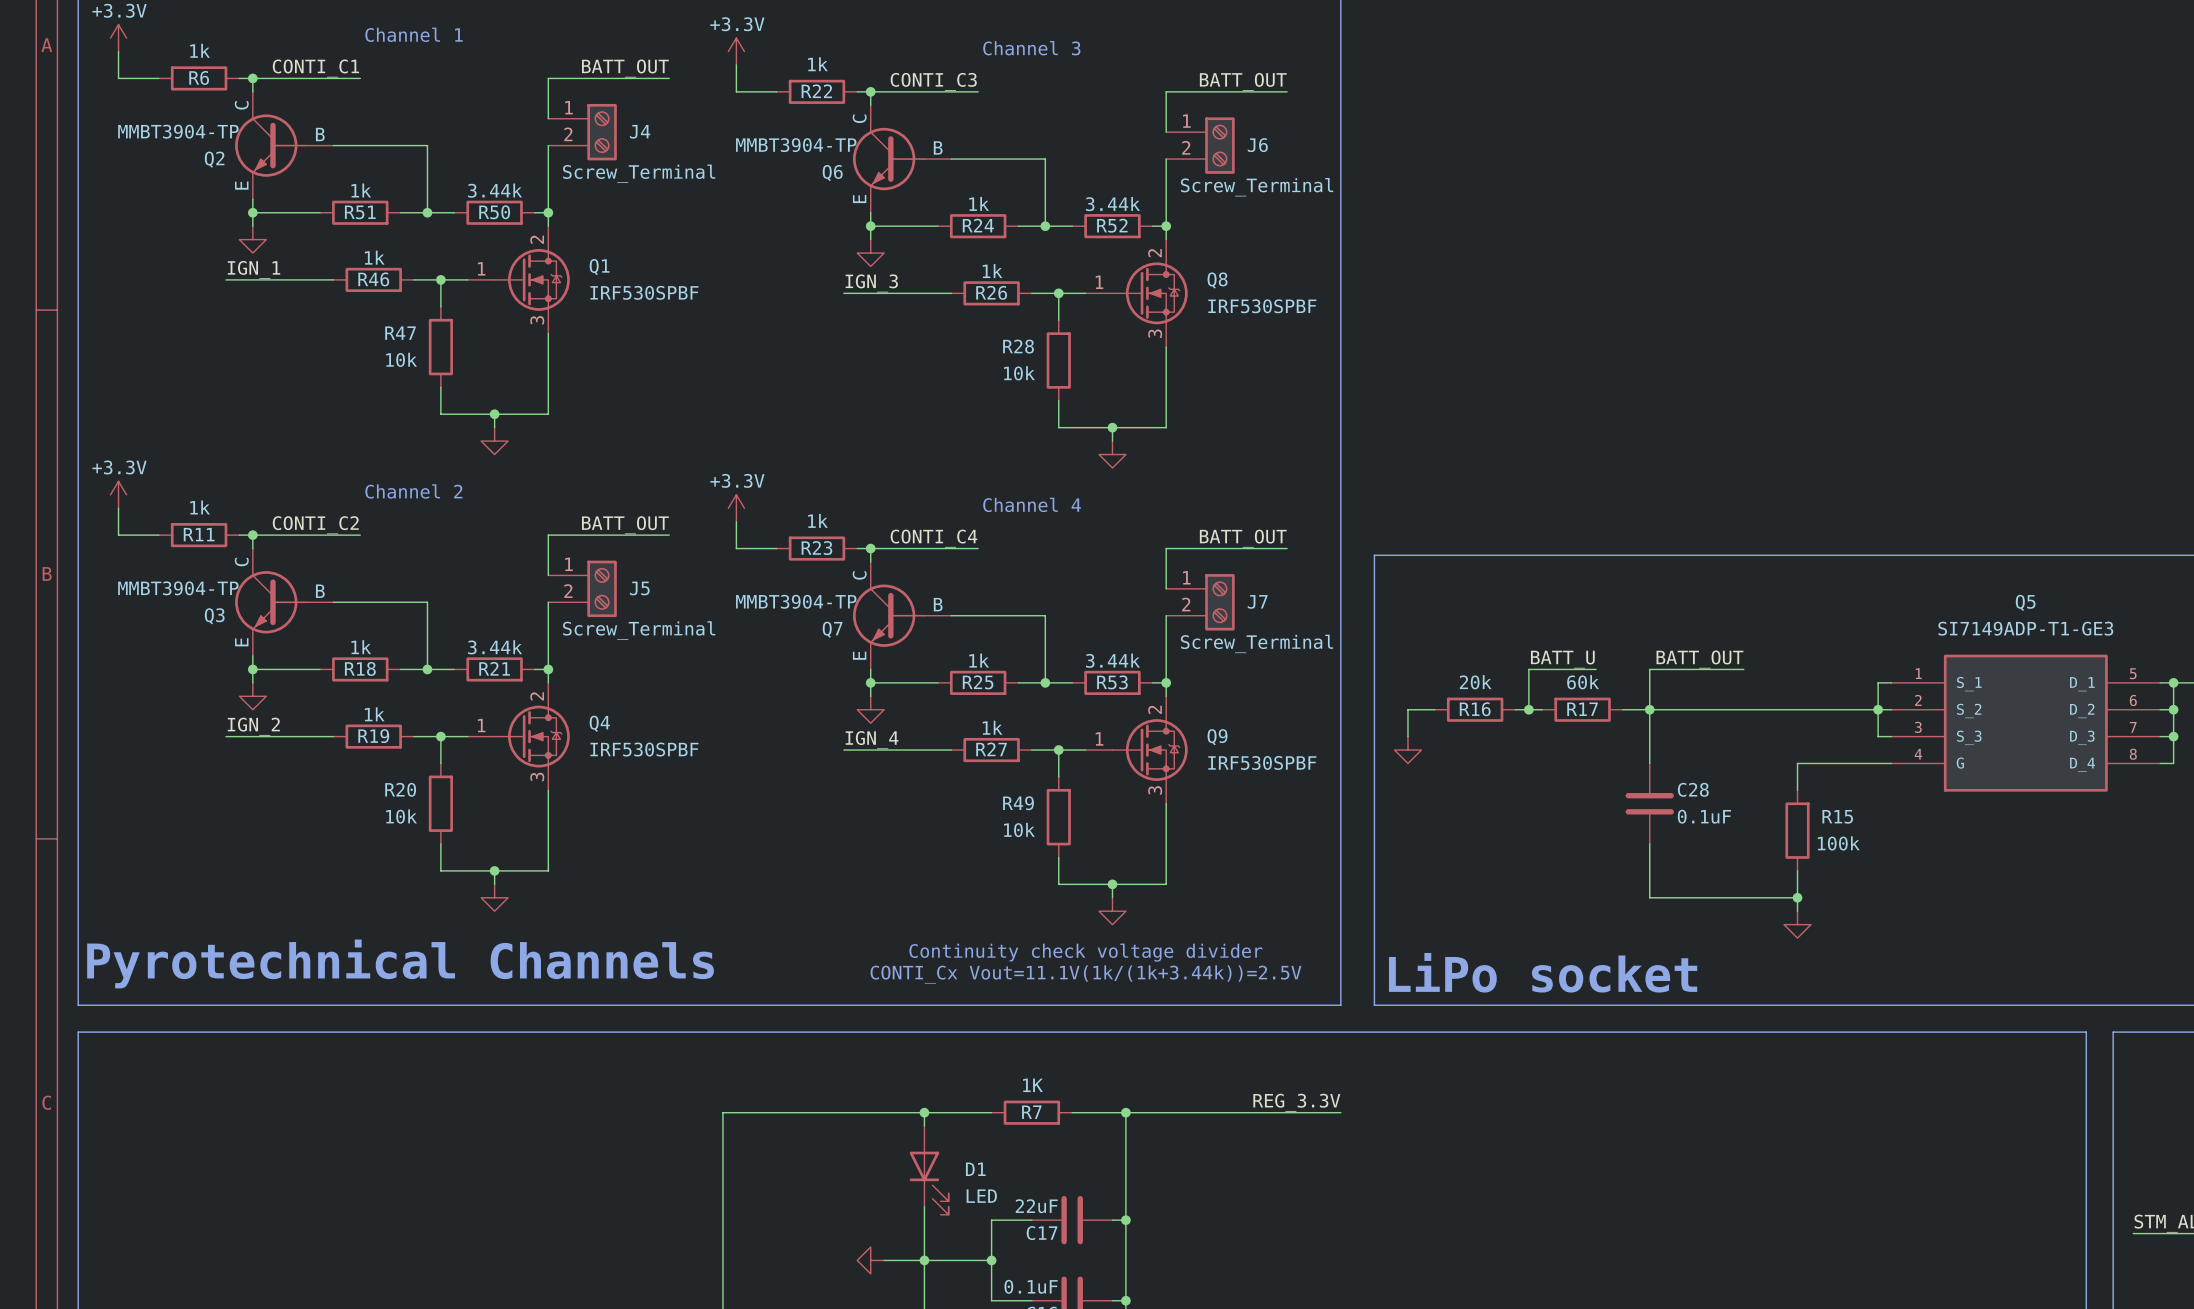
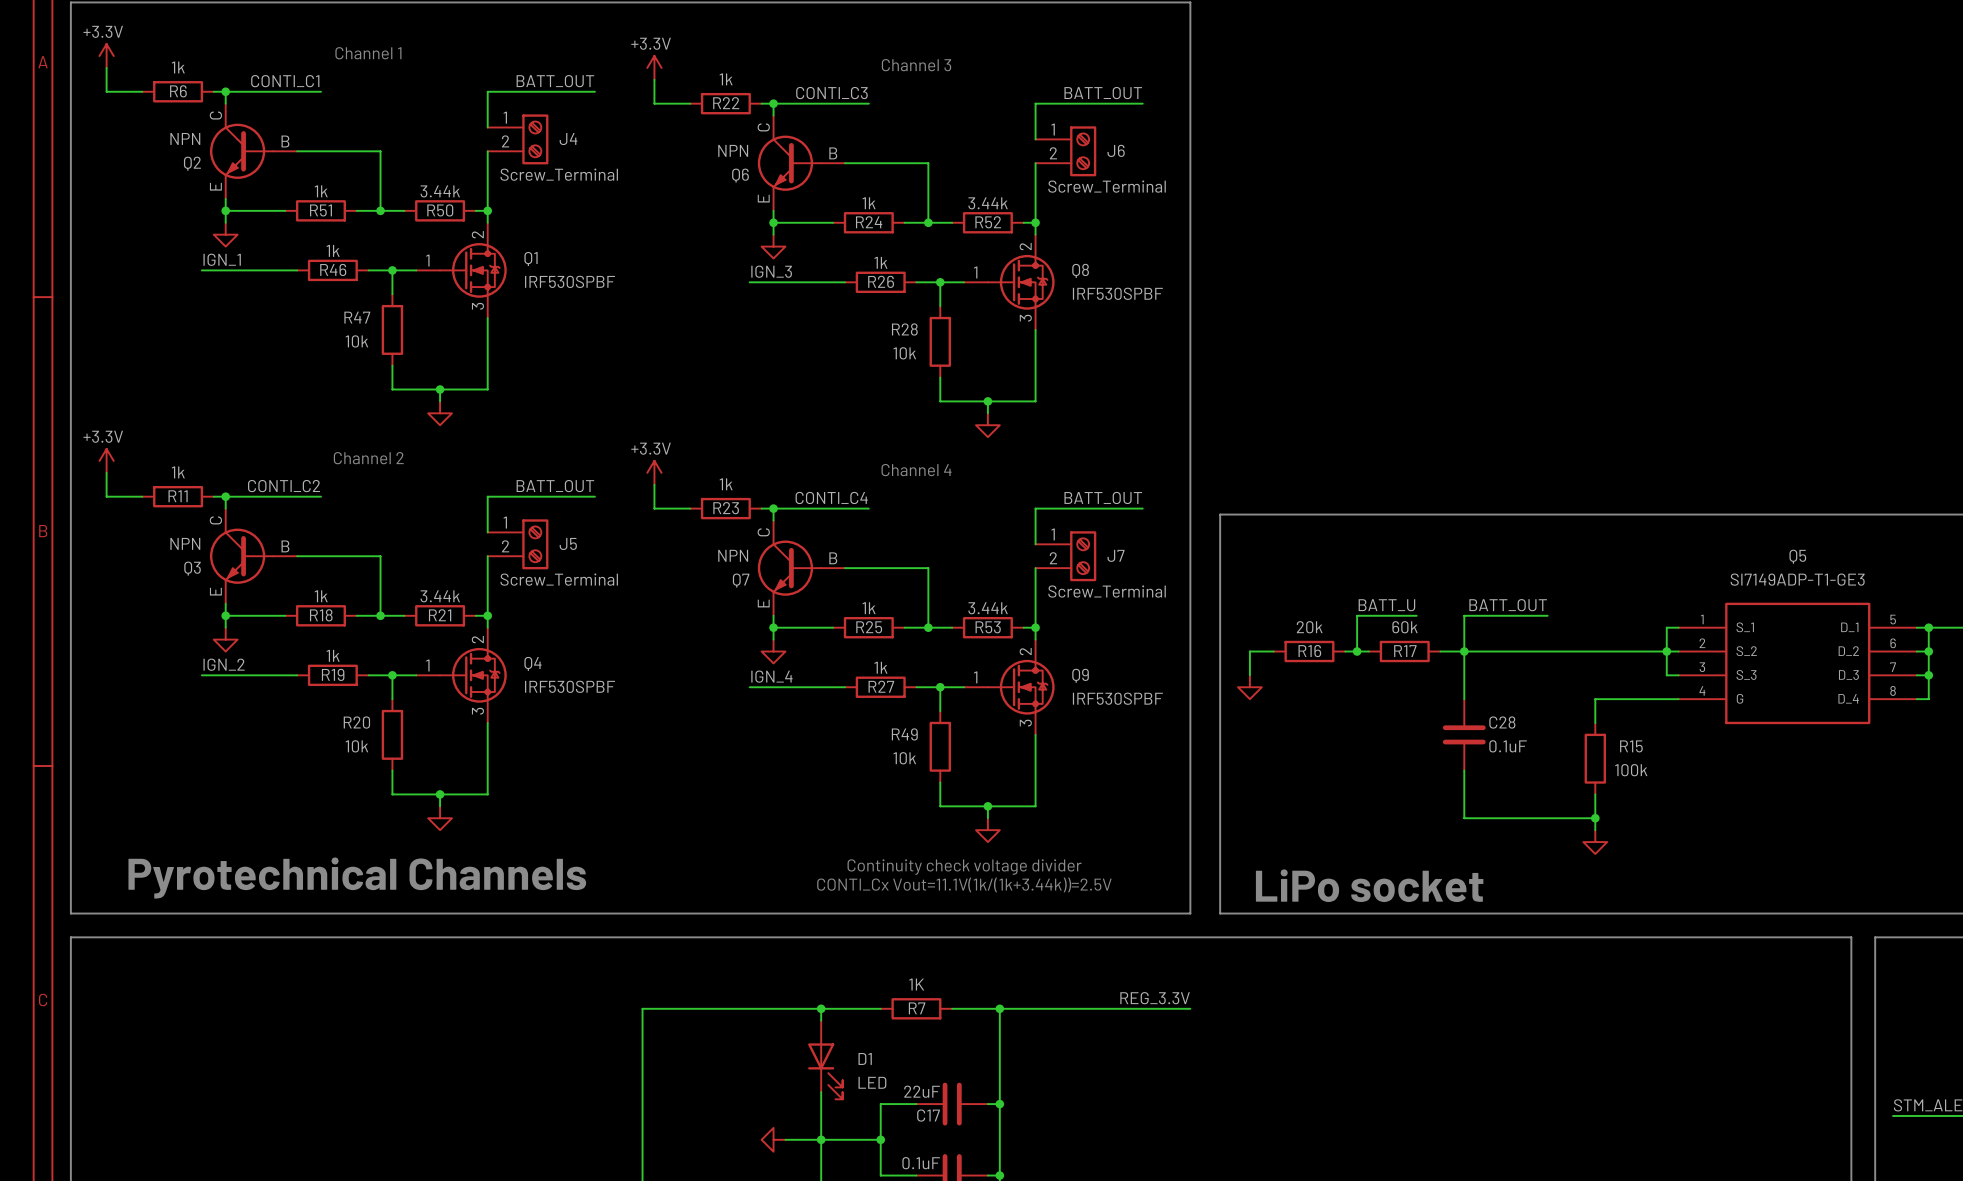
Q2 value: MMBT3904-TP (178, 131) -> NPN (185, 138)
Q6 value: MMBT3904-TP (796, 145) -> NPN (733, 150)
Q3 value: MMBT3904-TP (178, 588) -> NPN (185, 543)
Q7 value: MMBT3904-TP (796, 601) -> NPN (733, 555)

